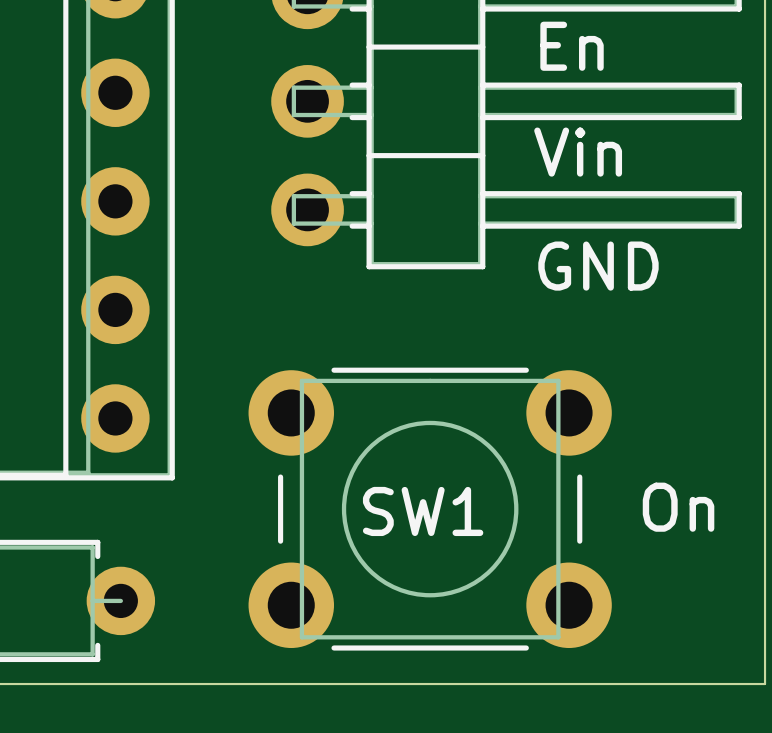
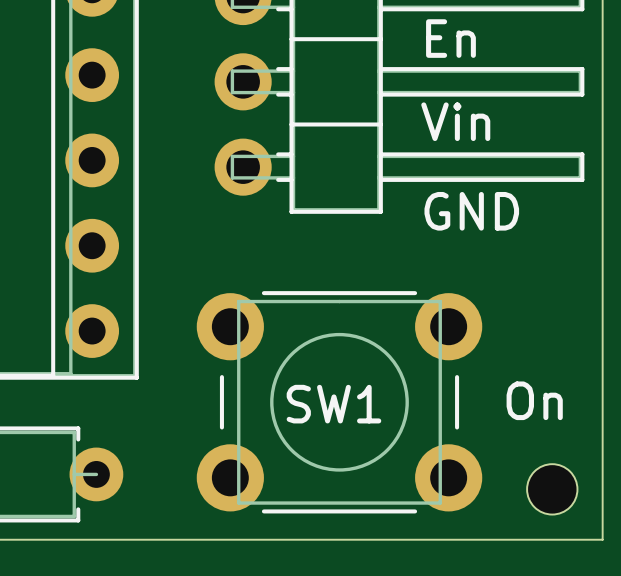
part: none -> (552, 489)

